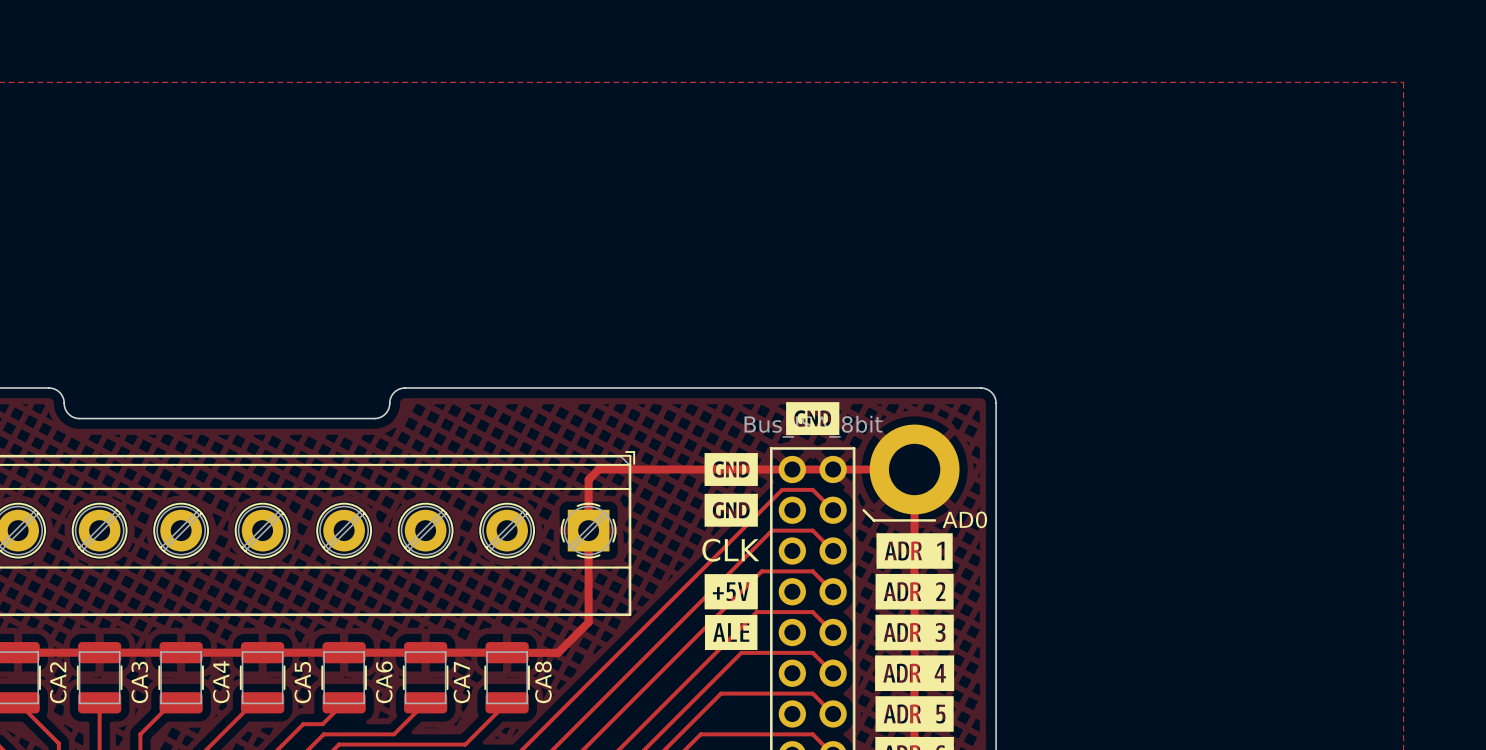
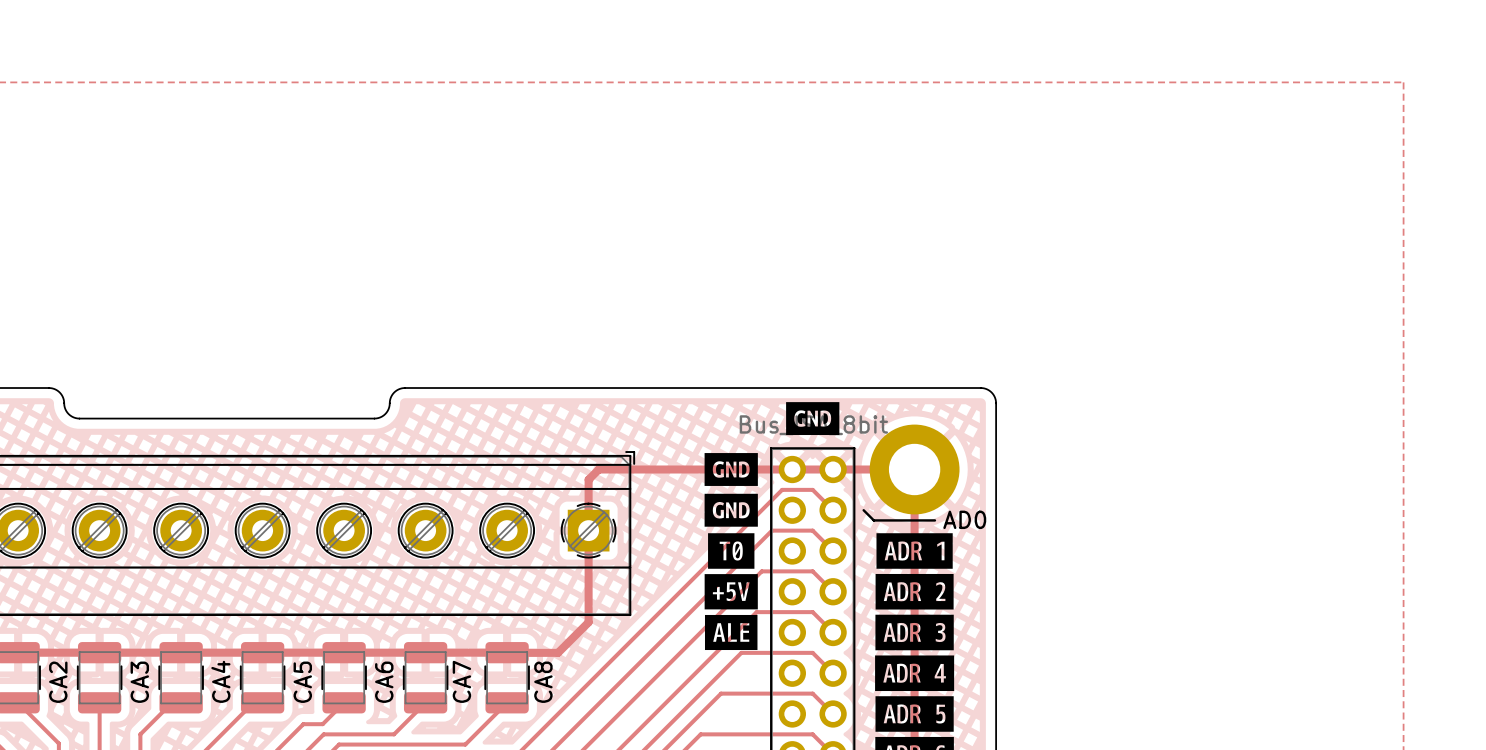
drawing: none -> [708, 533, 755, 569]
text: CLK (730, 550) -> none

